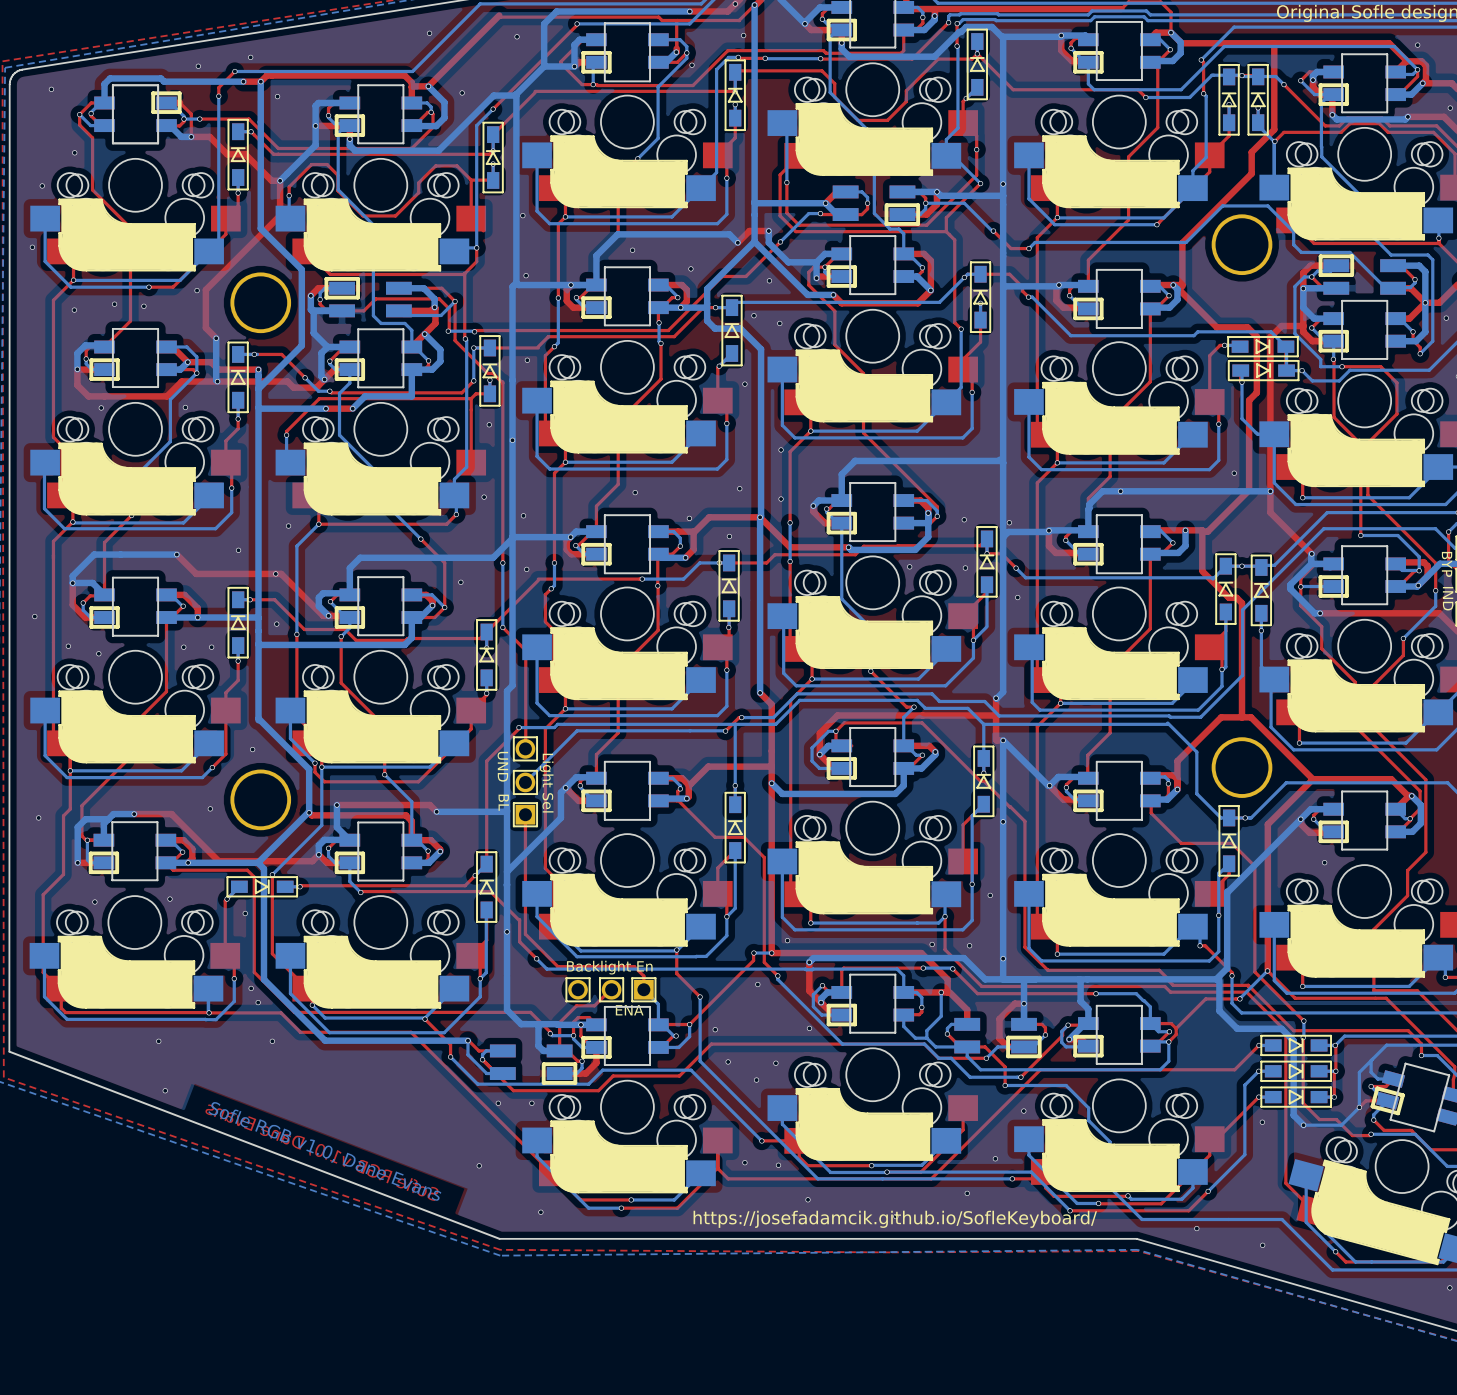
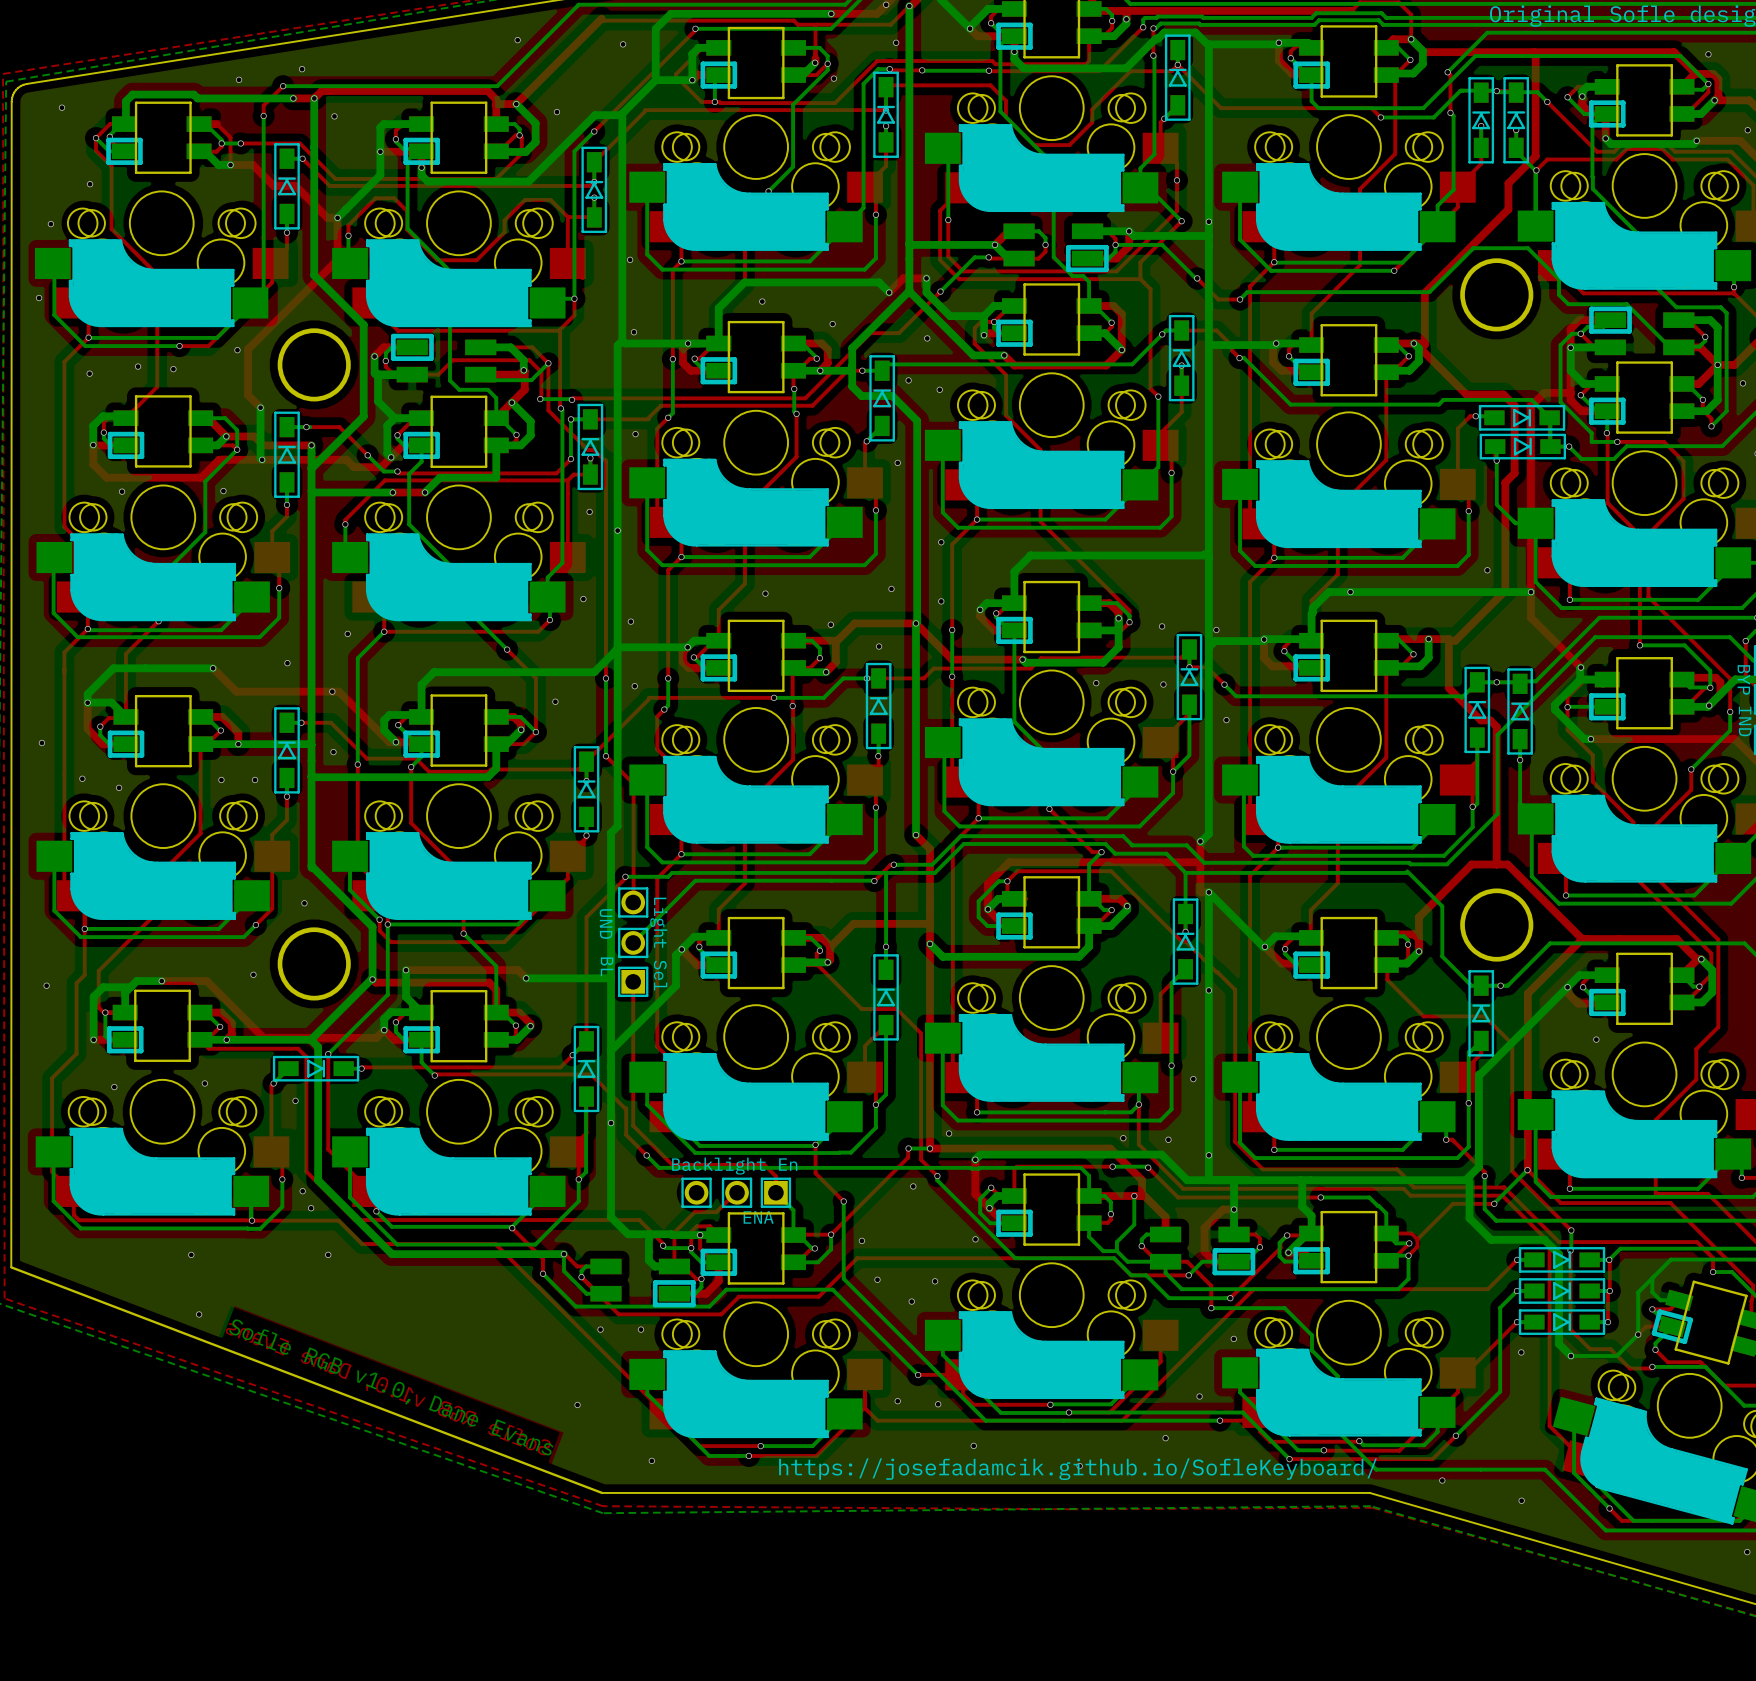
part side: bottom (135, 177) -> top (161, 221)

